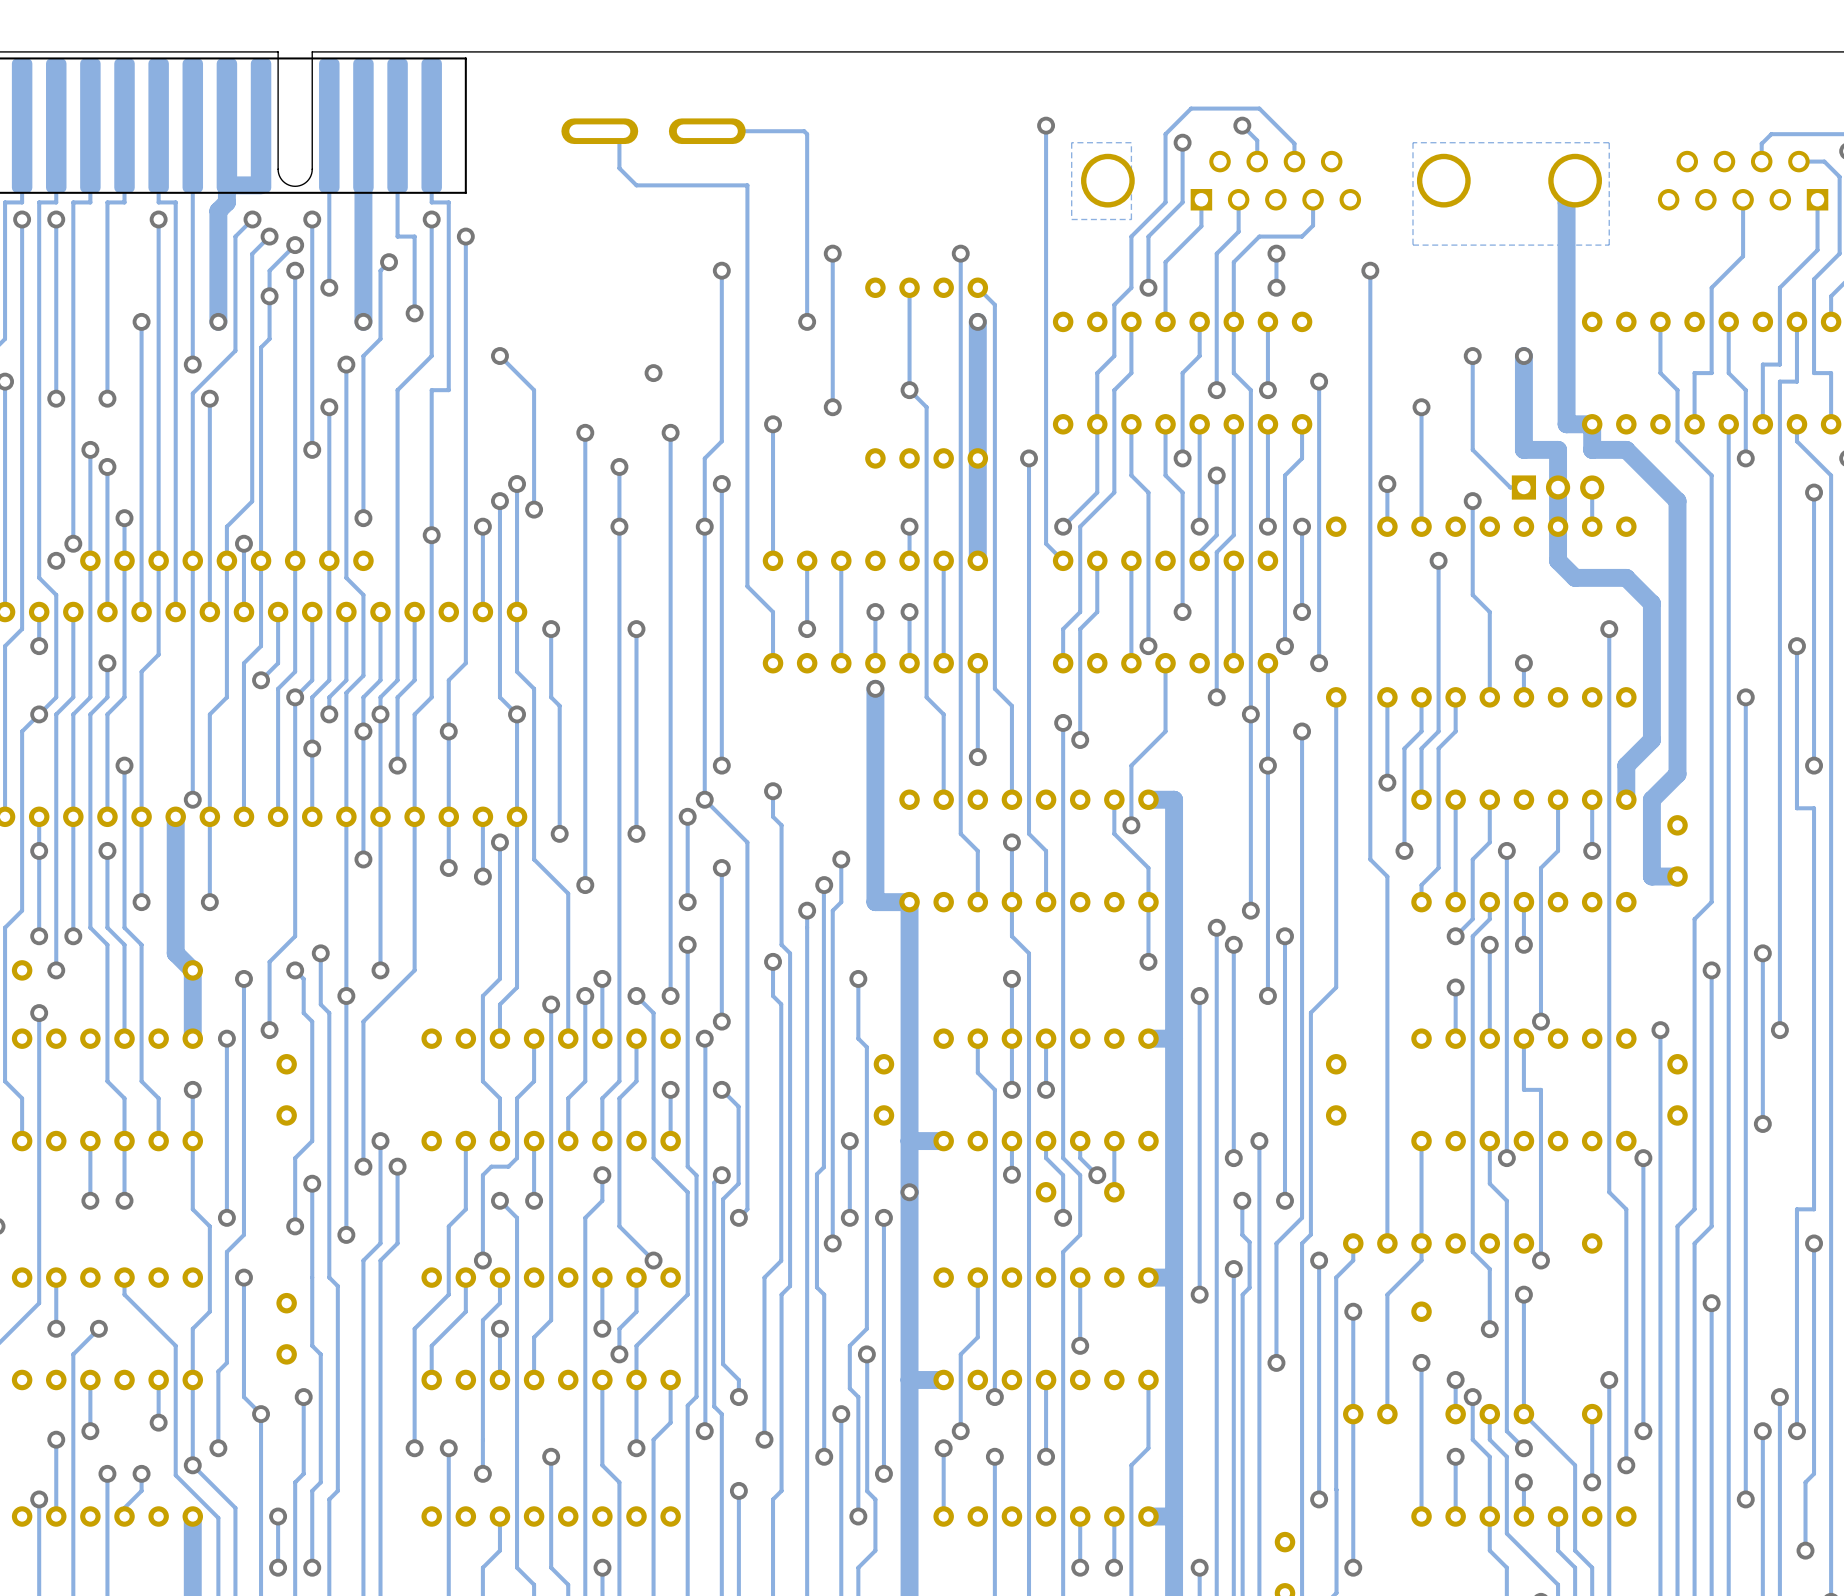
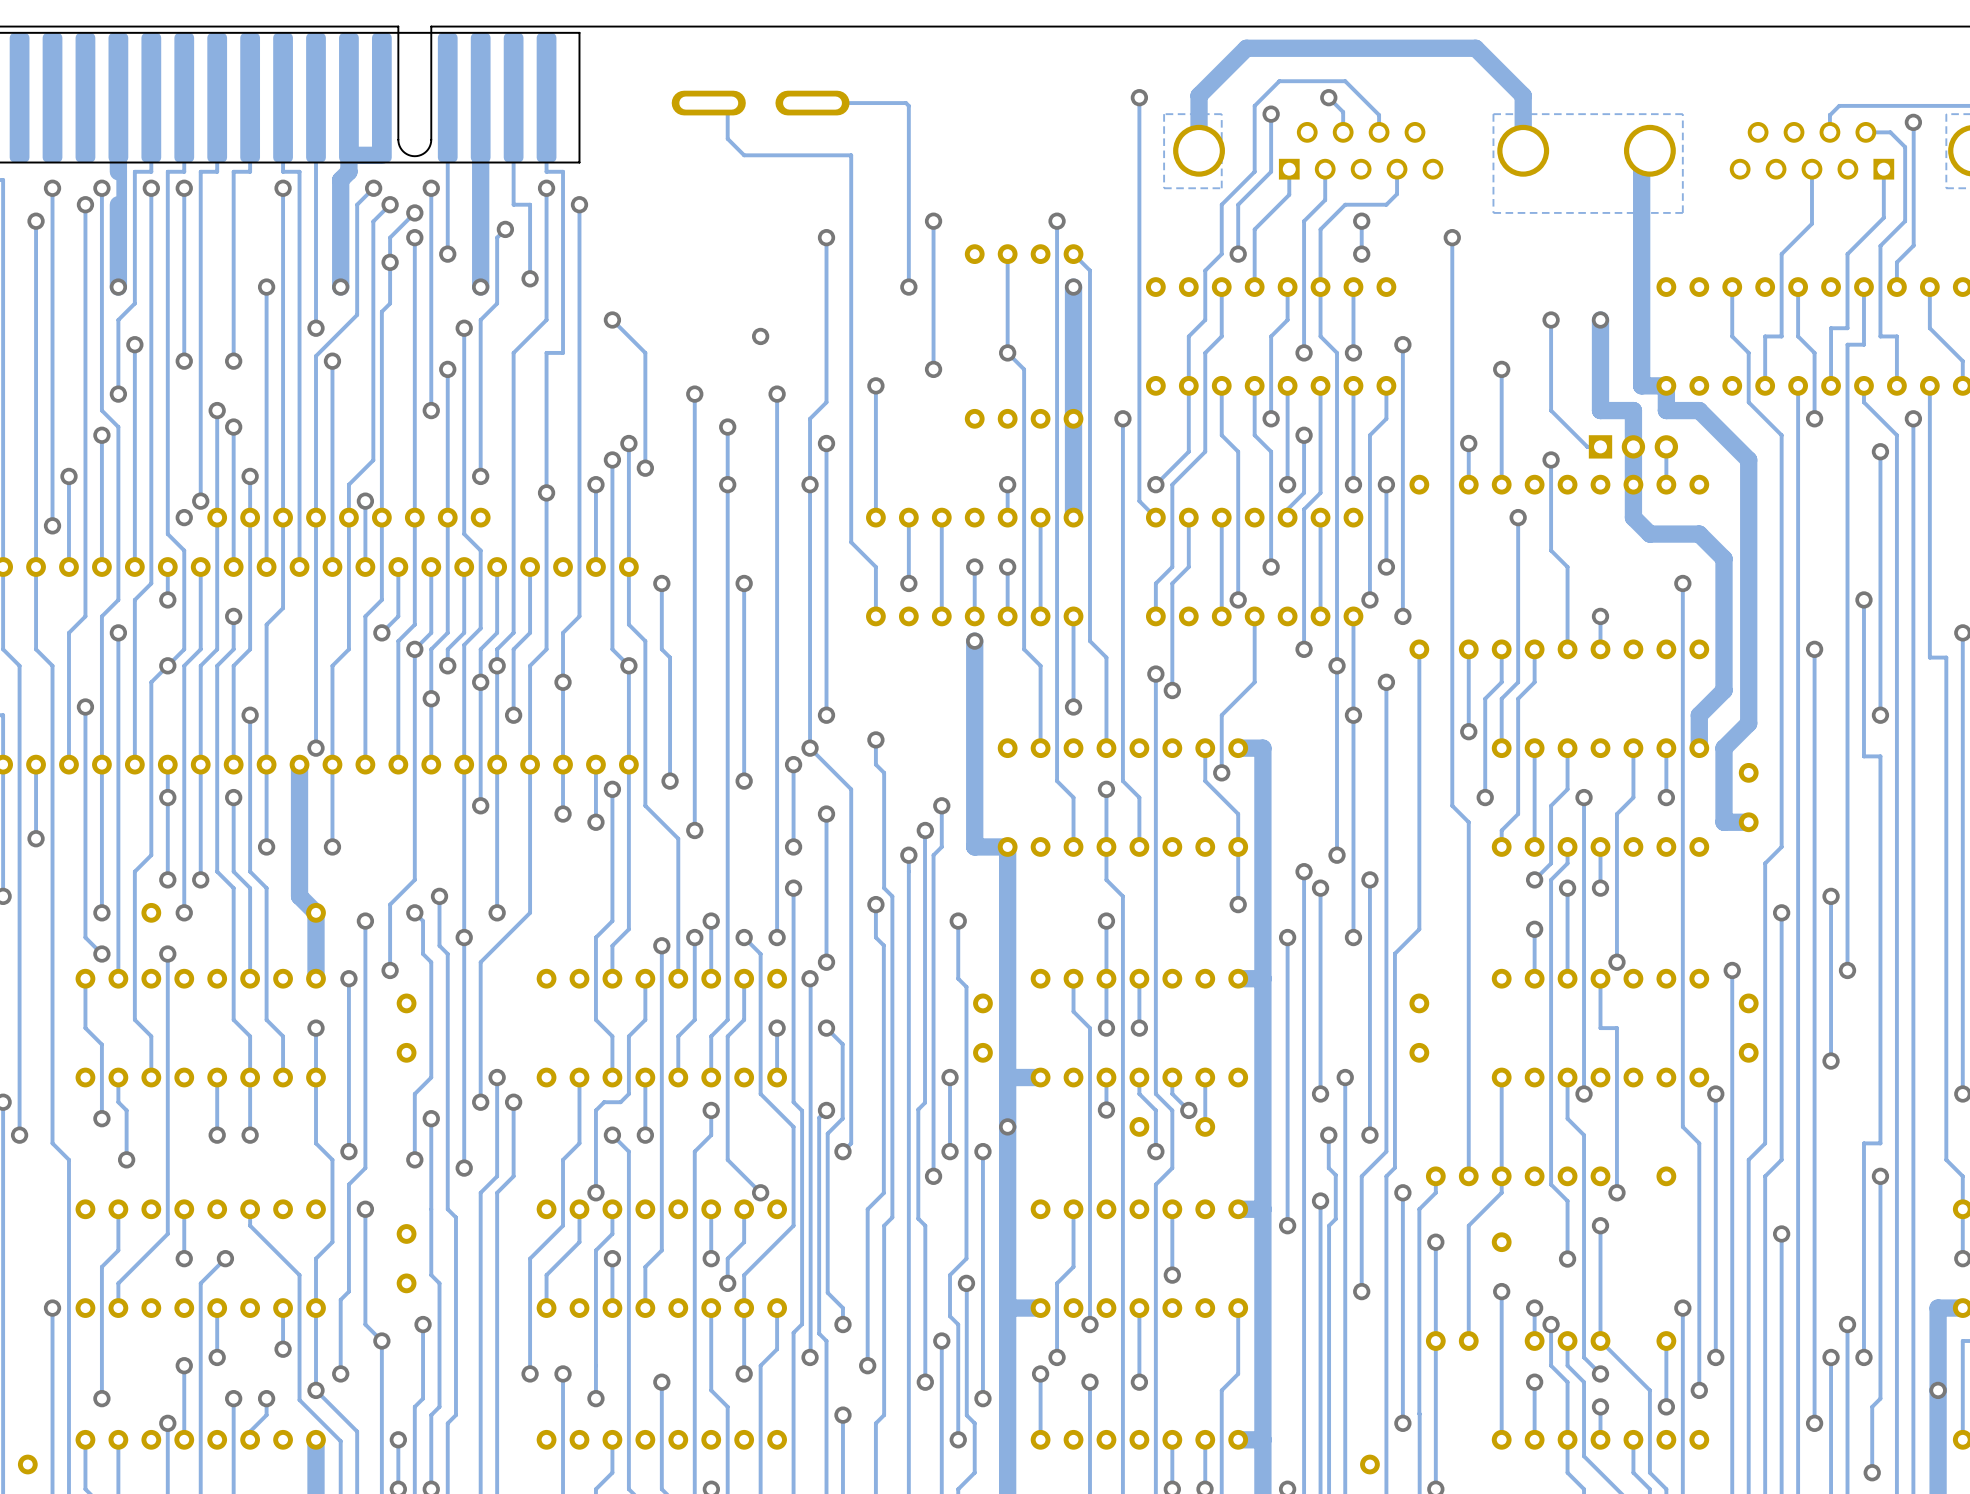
track: none -> (1523, 150) (1523, 95) (1475, 48) (1246, 48) (1199, 95) (1199, 150)

